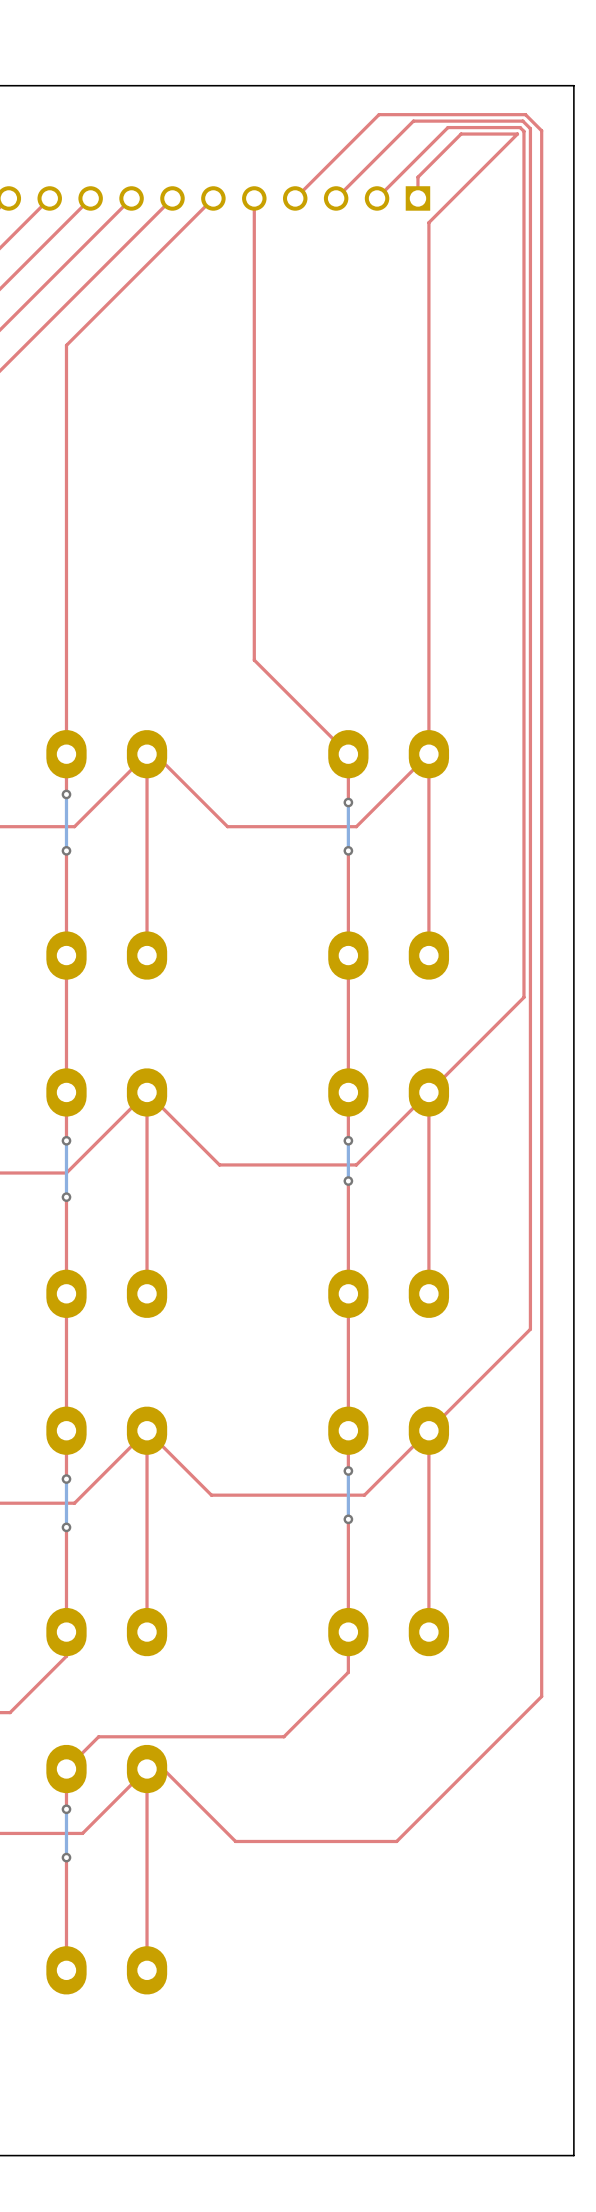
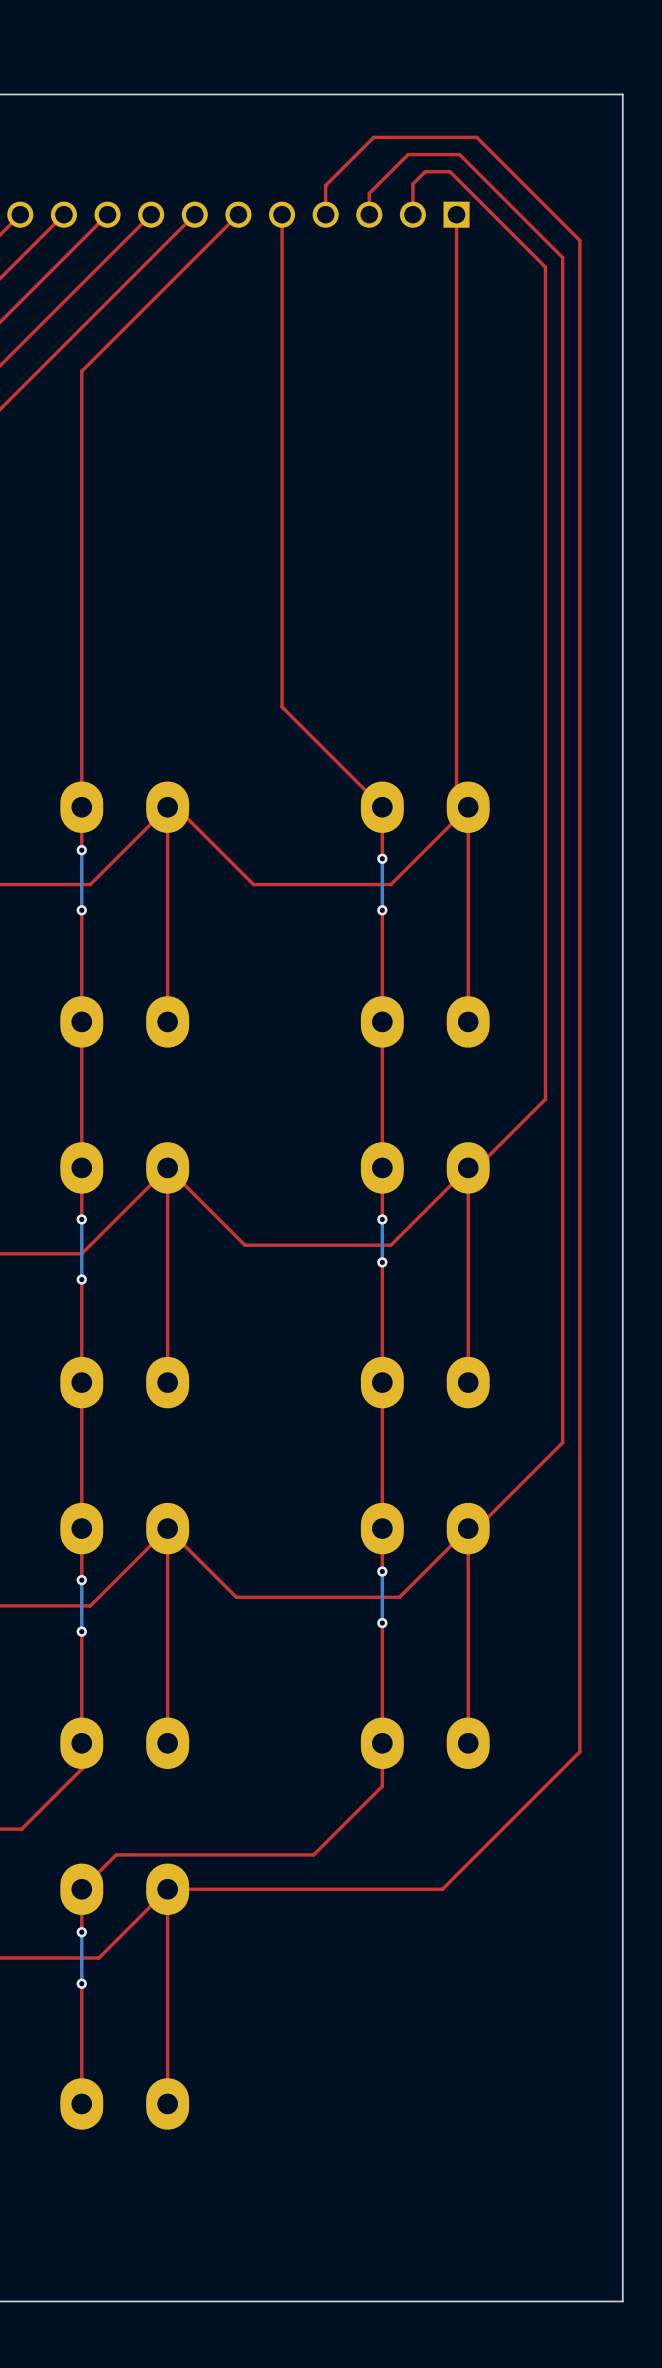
top track: (295, 198) (379, 114) (525, 114) (541, 130) (541, 1696) (396, 1841) (235, 1841) (163, 1769) -> (325, 214) (325, 185) (373, 137) (476, 137) (579, 240) (579, 1751) (442, 1889) (184, 1889)
top track: (336, 198) (413, 121) (522, 121) (530, 128) (530, 1329) (428, 1430) -> (369, 214) (369, 193) (408, 154) (459, 154) (562, 257) (562, 1442) (476, 1528) (468, 1528)
top track: (377, 198) (447, 127) (520, 127) (523, 131) (523, 997) (428, 1092) -> (412, 214) (412, 184) (425, 171) (450, 171) (545, 267) (545, 1099) (476, 1167) (468, 1167)
top track: (417, 198) (417, 177) (461, 134) (517, 134) (428, 222) (428, 754) -> (456, 214) (456, 795)

